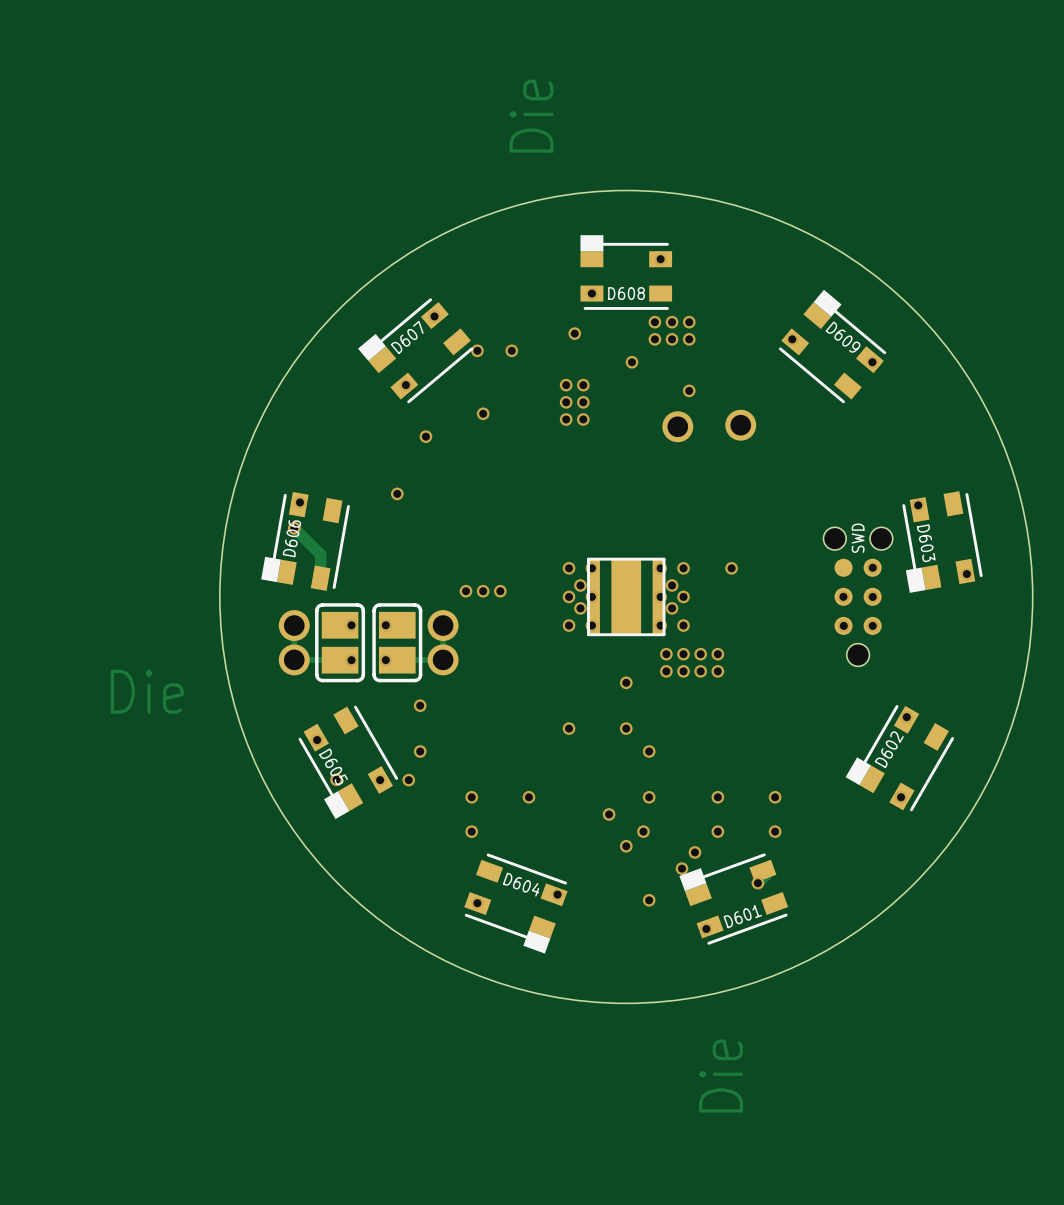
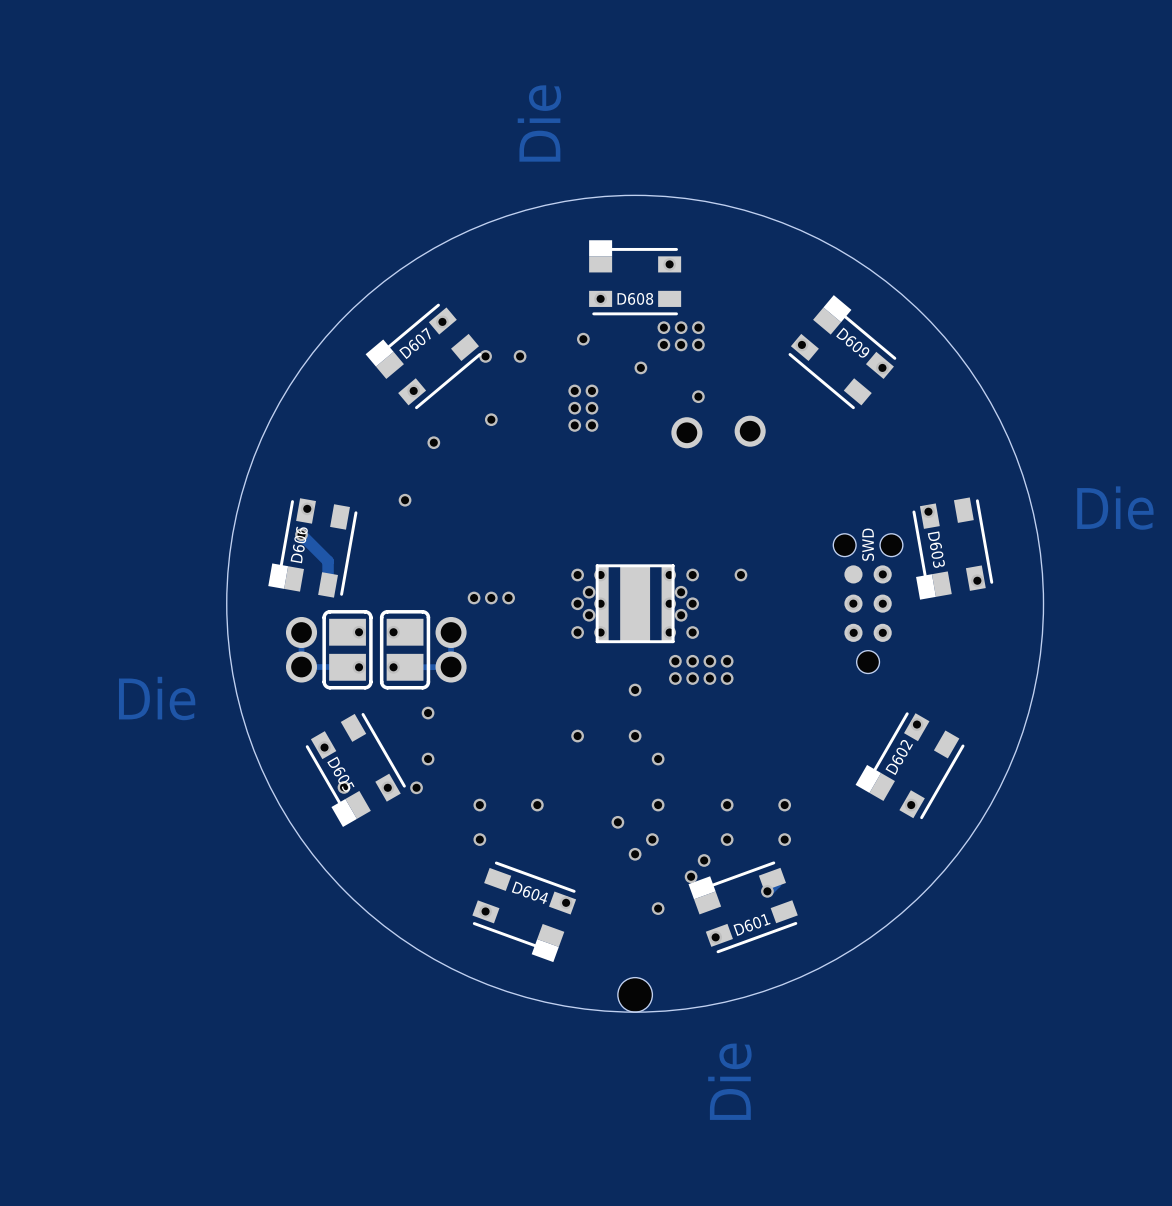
hole: none -> (635, 994)

